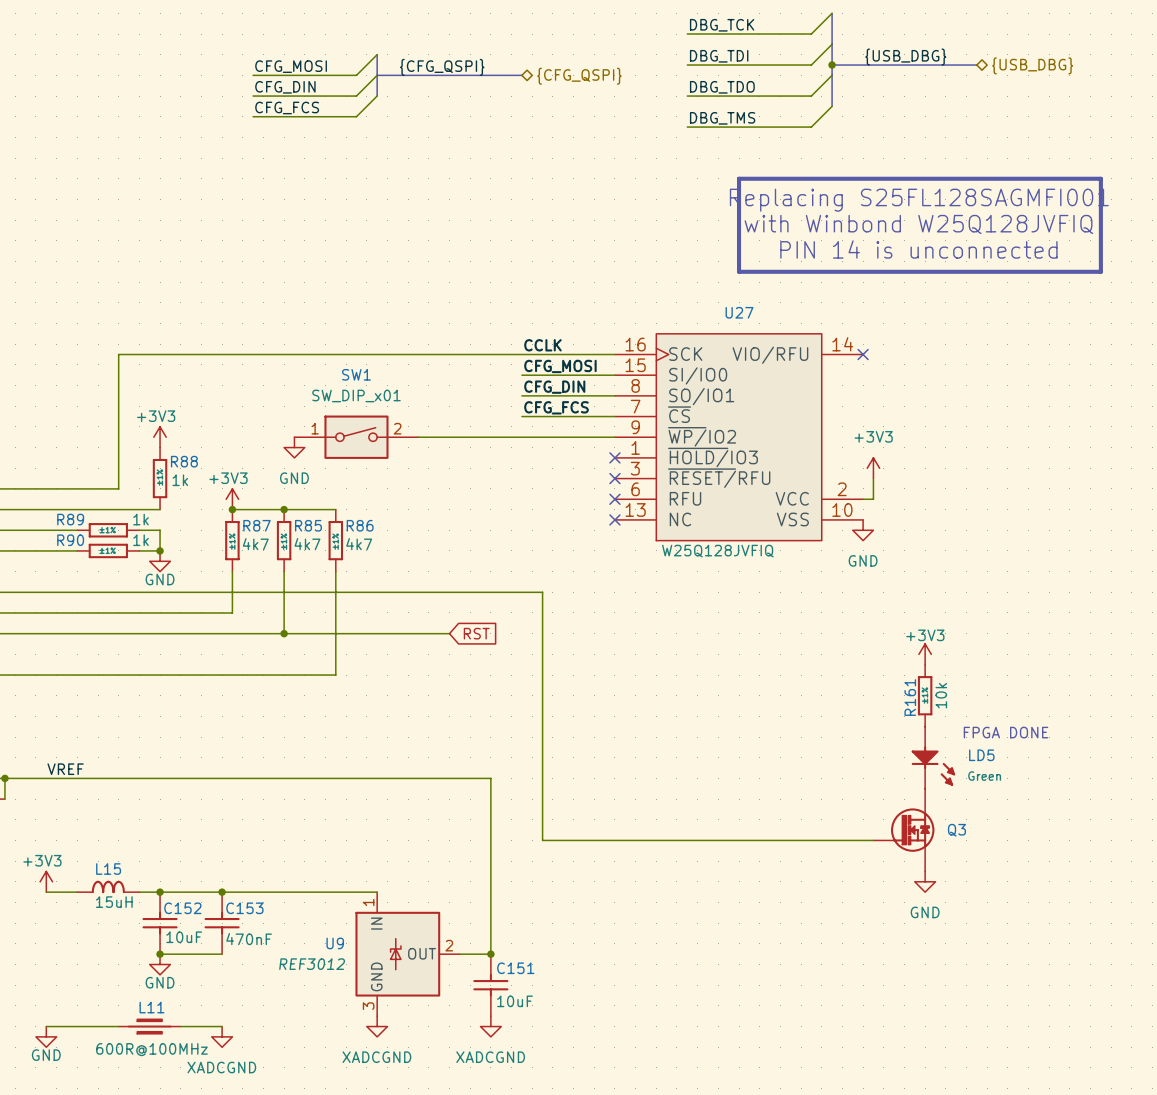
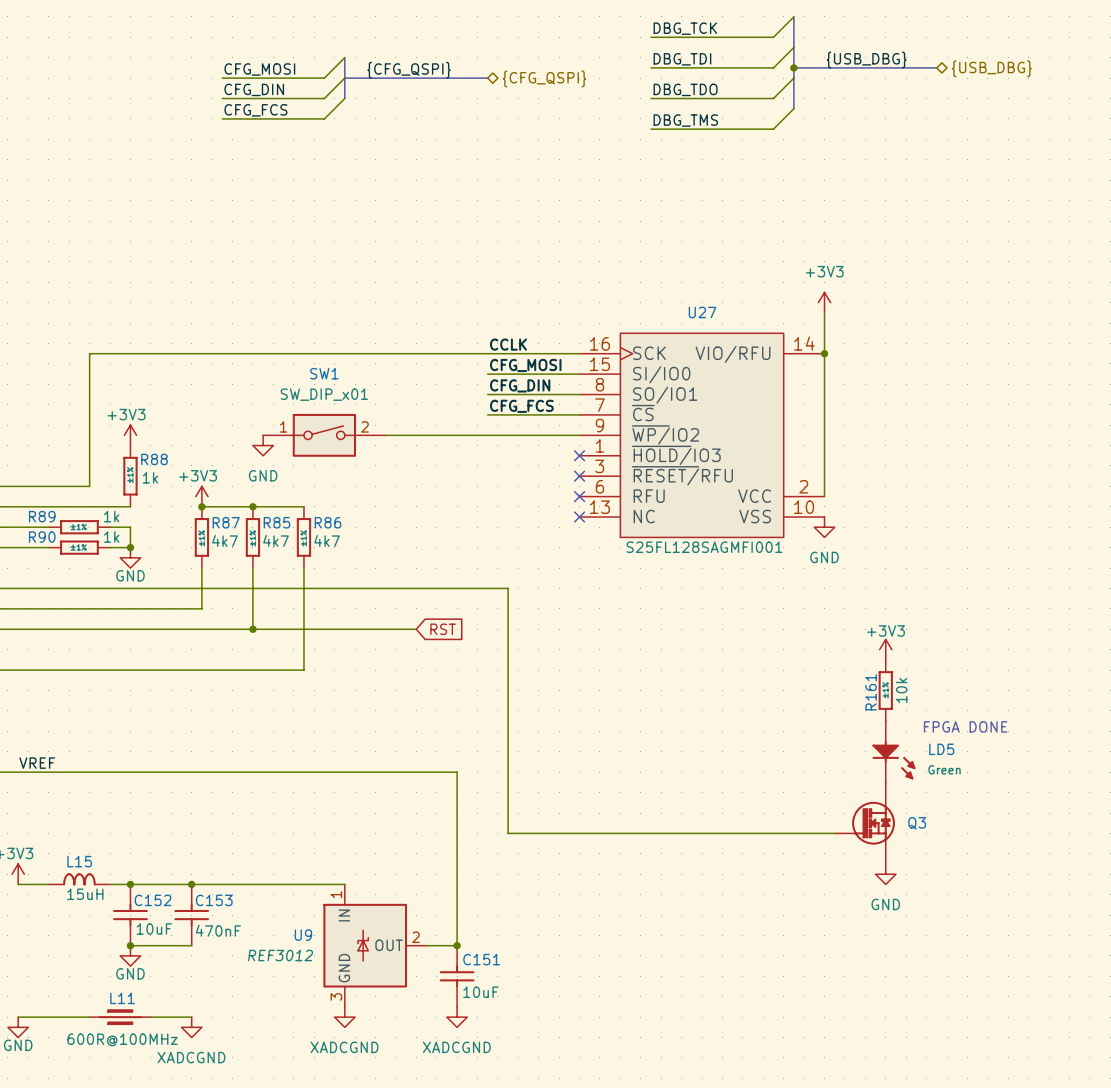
line: (739, 178) (1100, 178) (1100, 271) (739, 271) (739, 178) -> none
text: Replacing S25FL128SAGMFI001 (919, 200) -> none
text: with Winbond W25Q128JVFIQ (918, 224) -> none
text: PIN 14 is unconnected (918, 249) -> none
no-connect mark: (863, 354) -> none
junction: none -> (824, 353)
power symbol position: +3V3 (873, 468) -> +3V3 (824, 302)
wire: (873, 478) (873, 499) (863, 499) -> (824, 312) (824, 496)
U27 value: W25Q128JVFIQ (717, 551) -> S25FL128SAGMFI001 (704, 547)

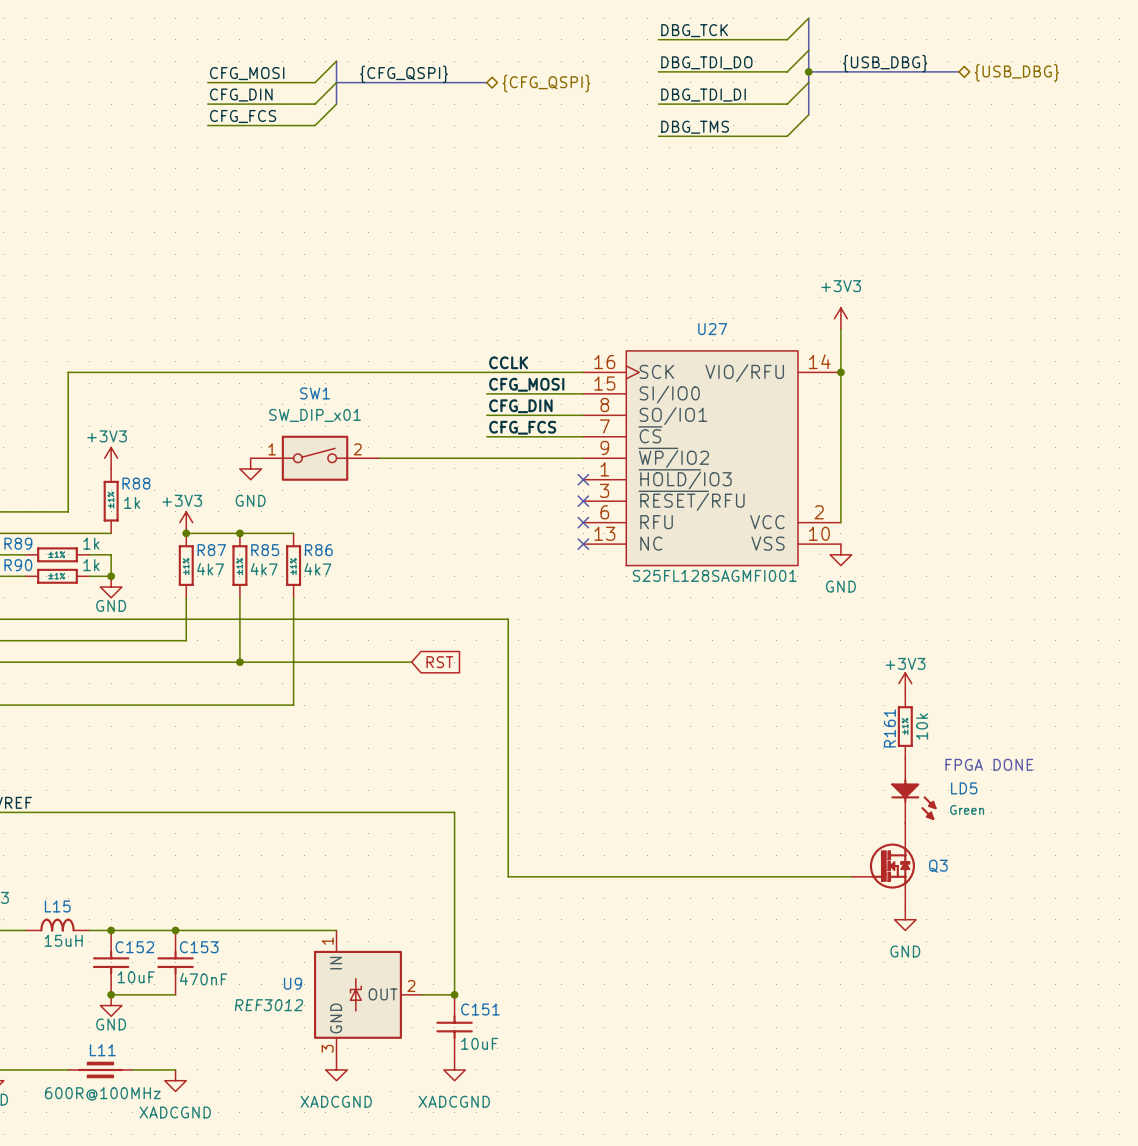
label: DBG_TDI (682, 59) -> DBG_TDI_DO (706, 62)
label: DBG_TDO (685, 89) -> DBG_TDI_DI (703, 95)

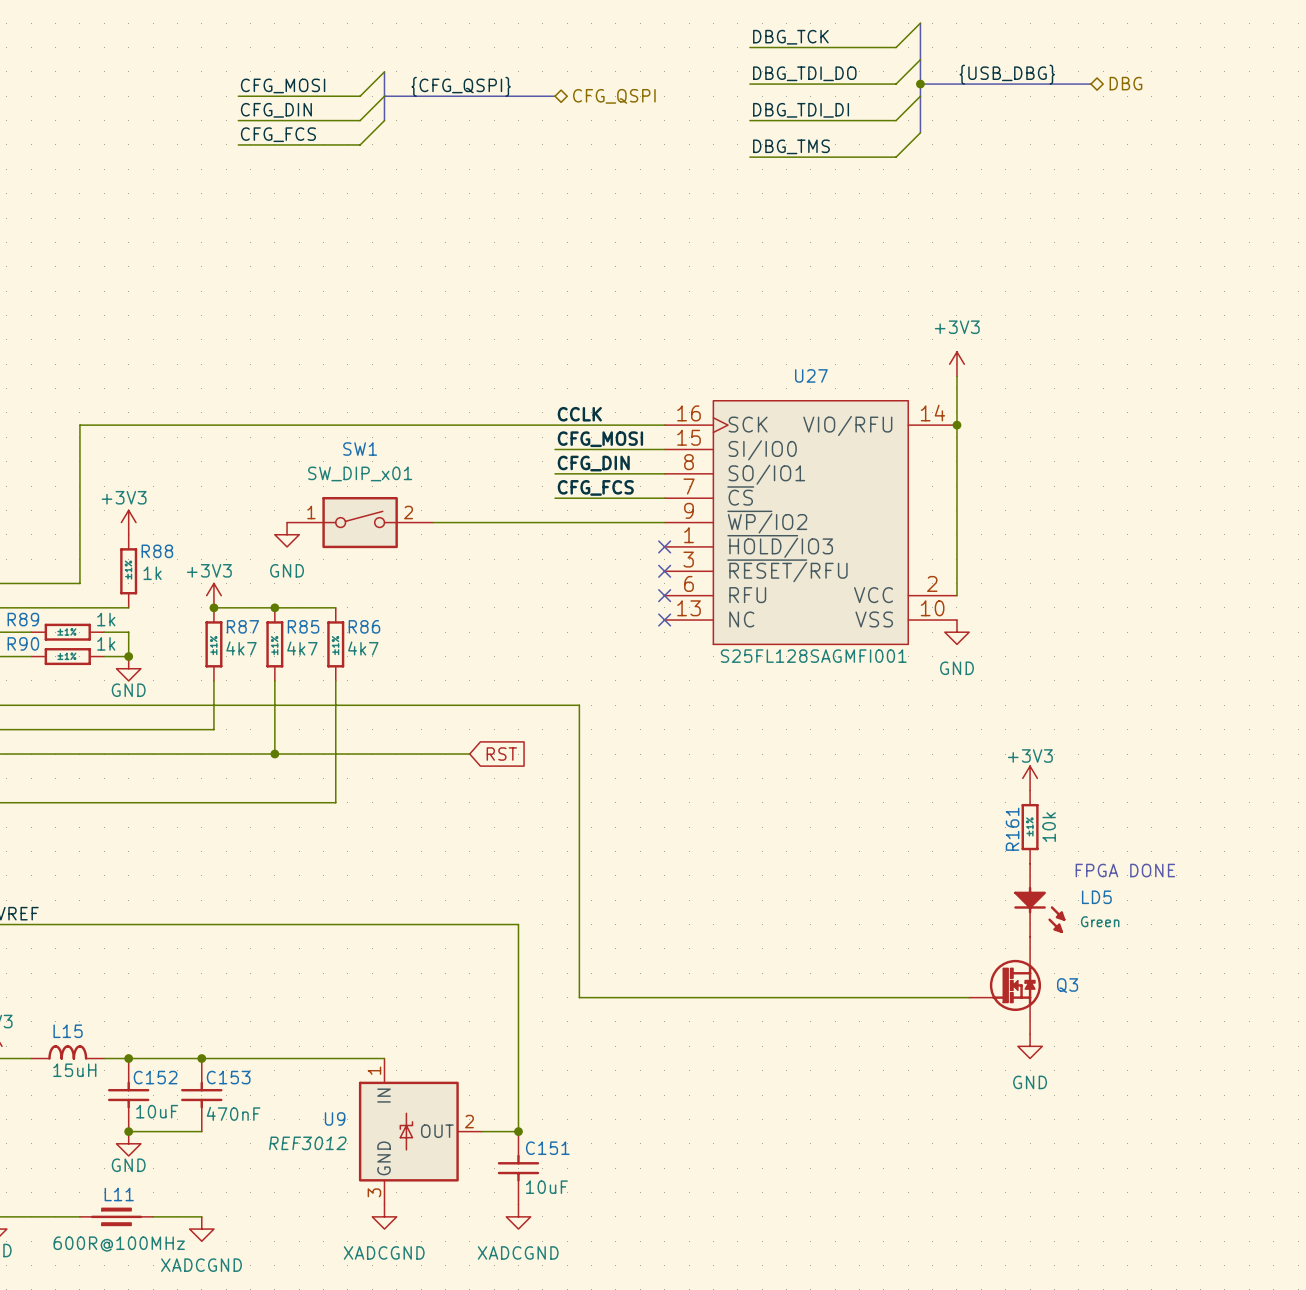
hierarchical label: {USB_DBG} (1016, 72) -> DBG (1125, 83)
hierarchical label: {CFG_QSPI} (546, 83) -> CFG_QSPI (614, 96)

